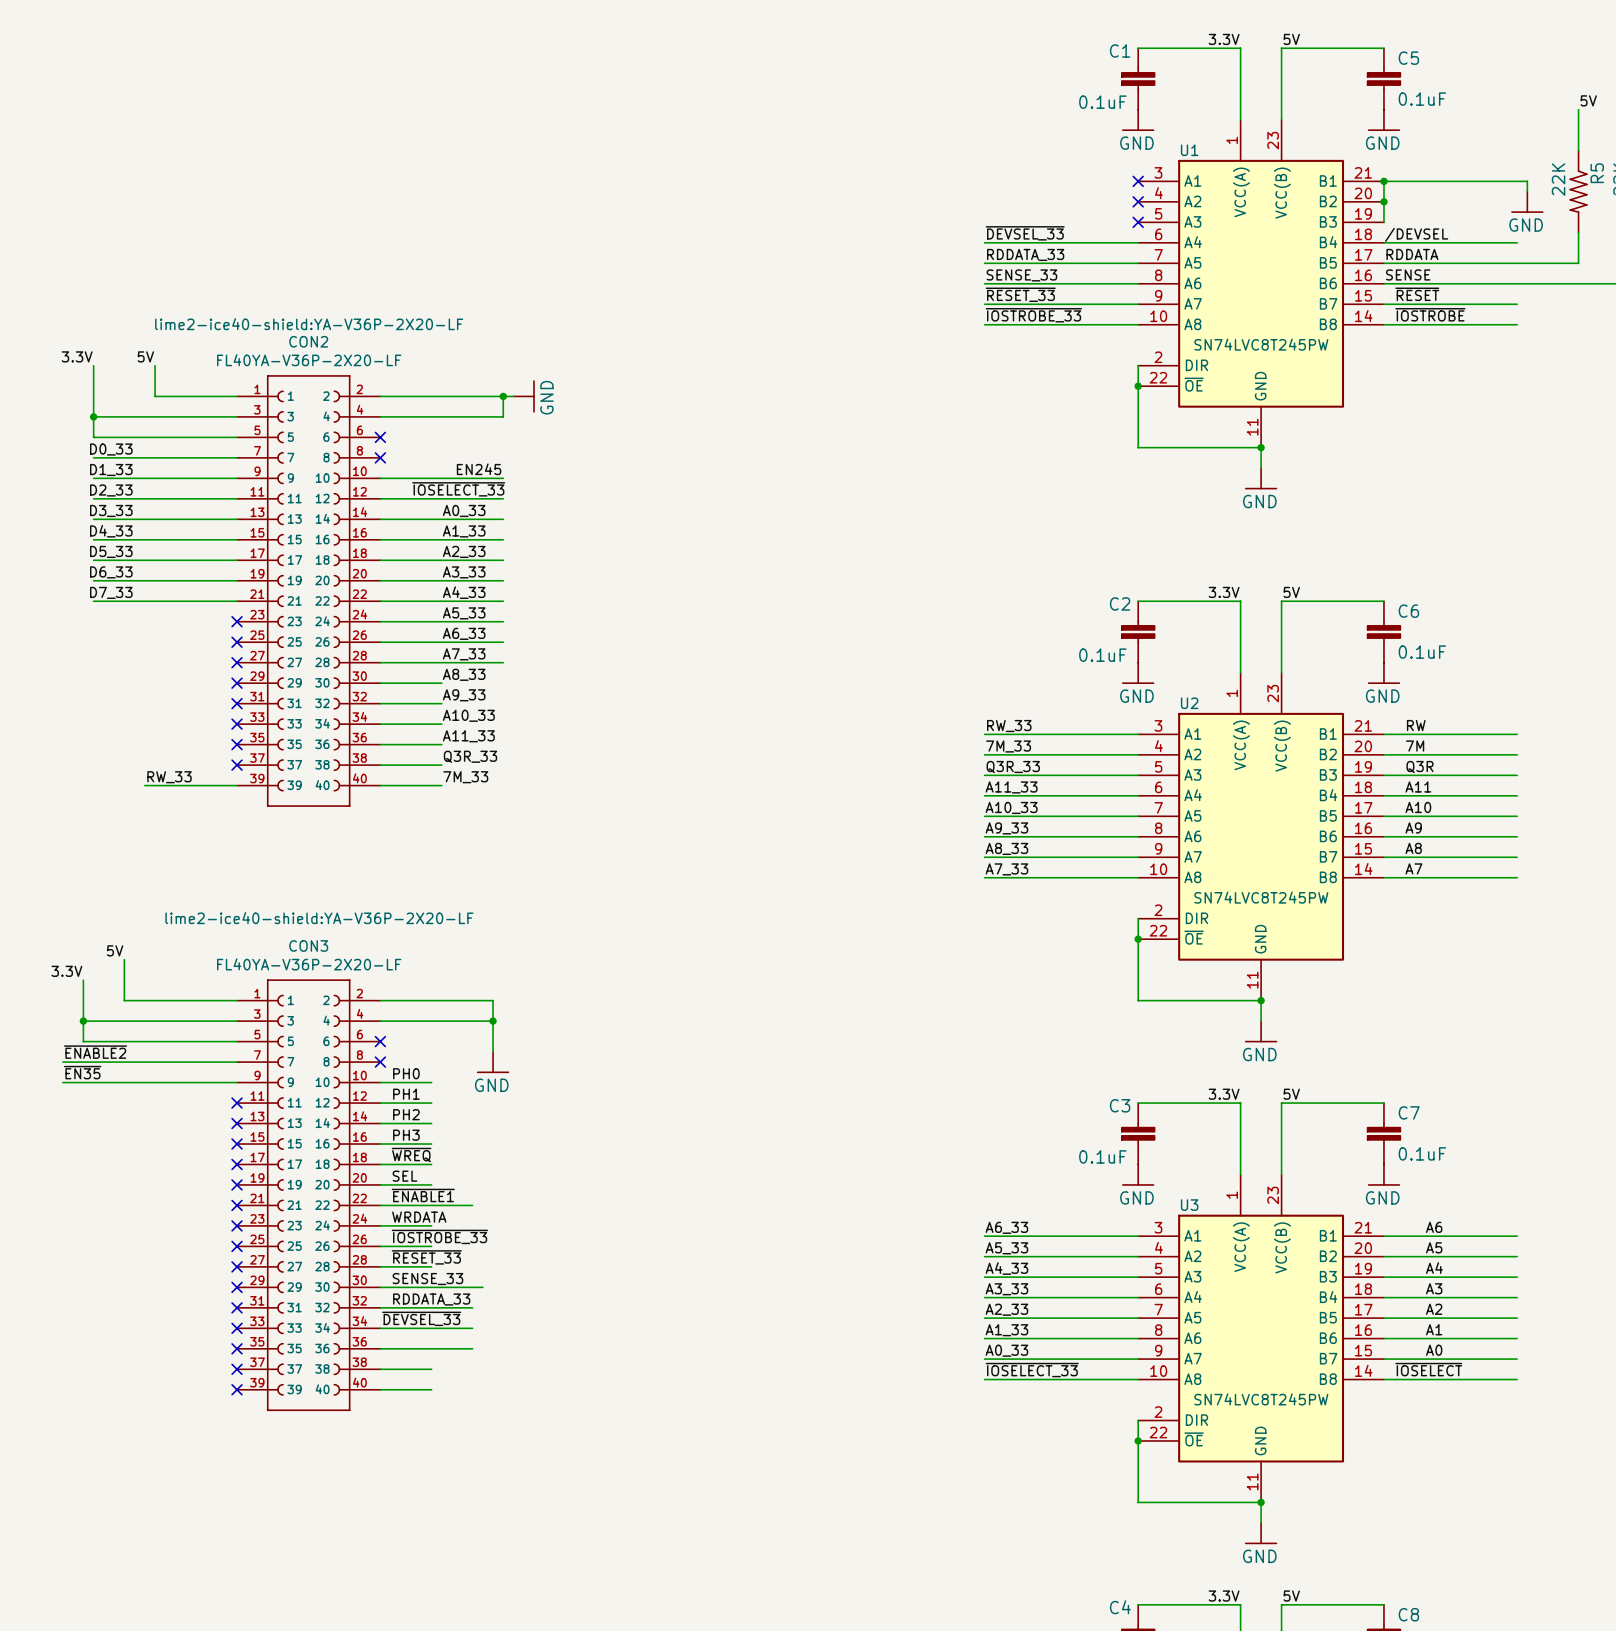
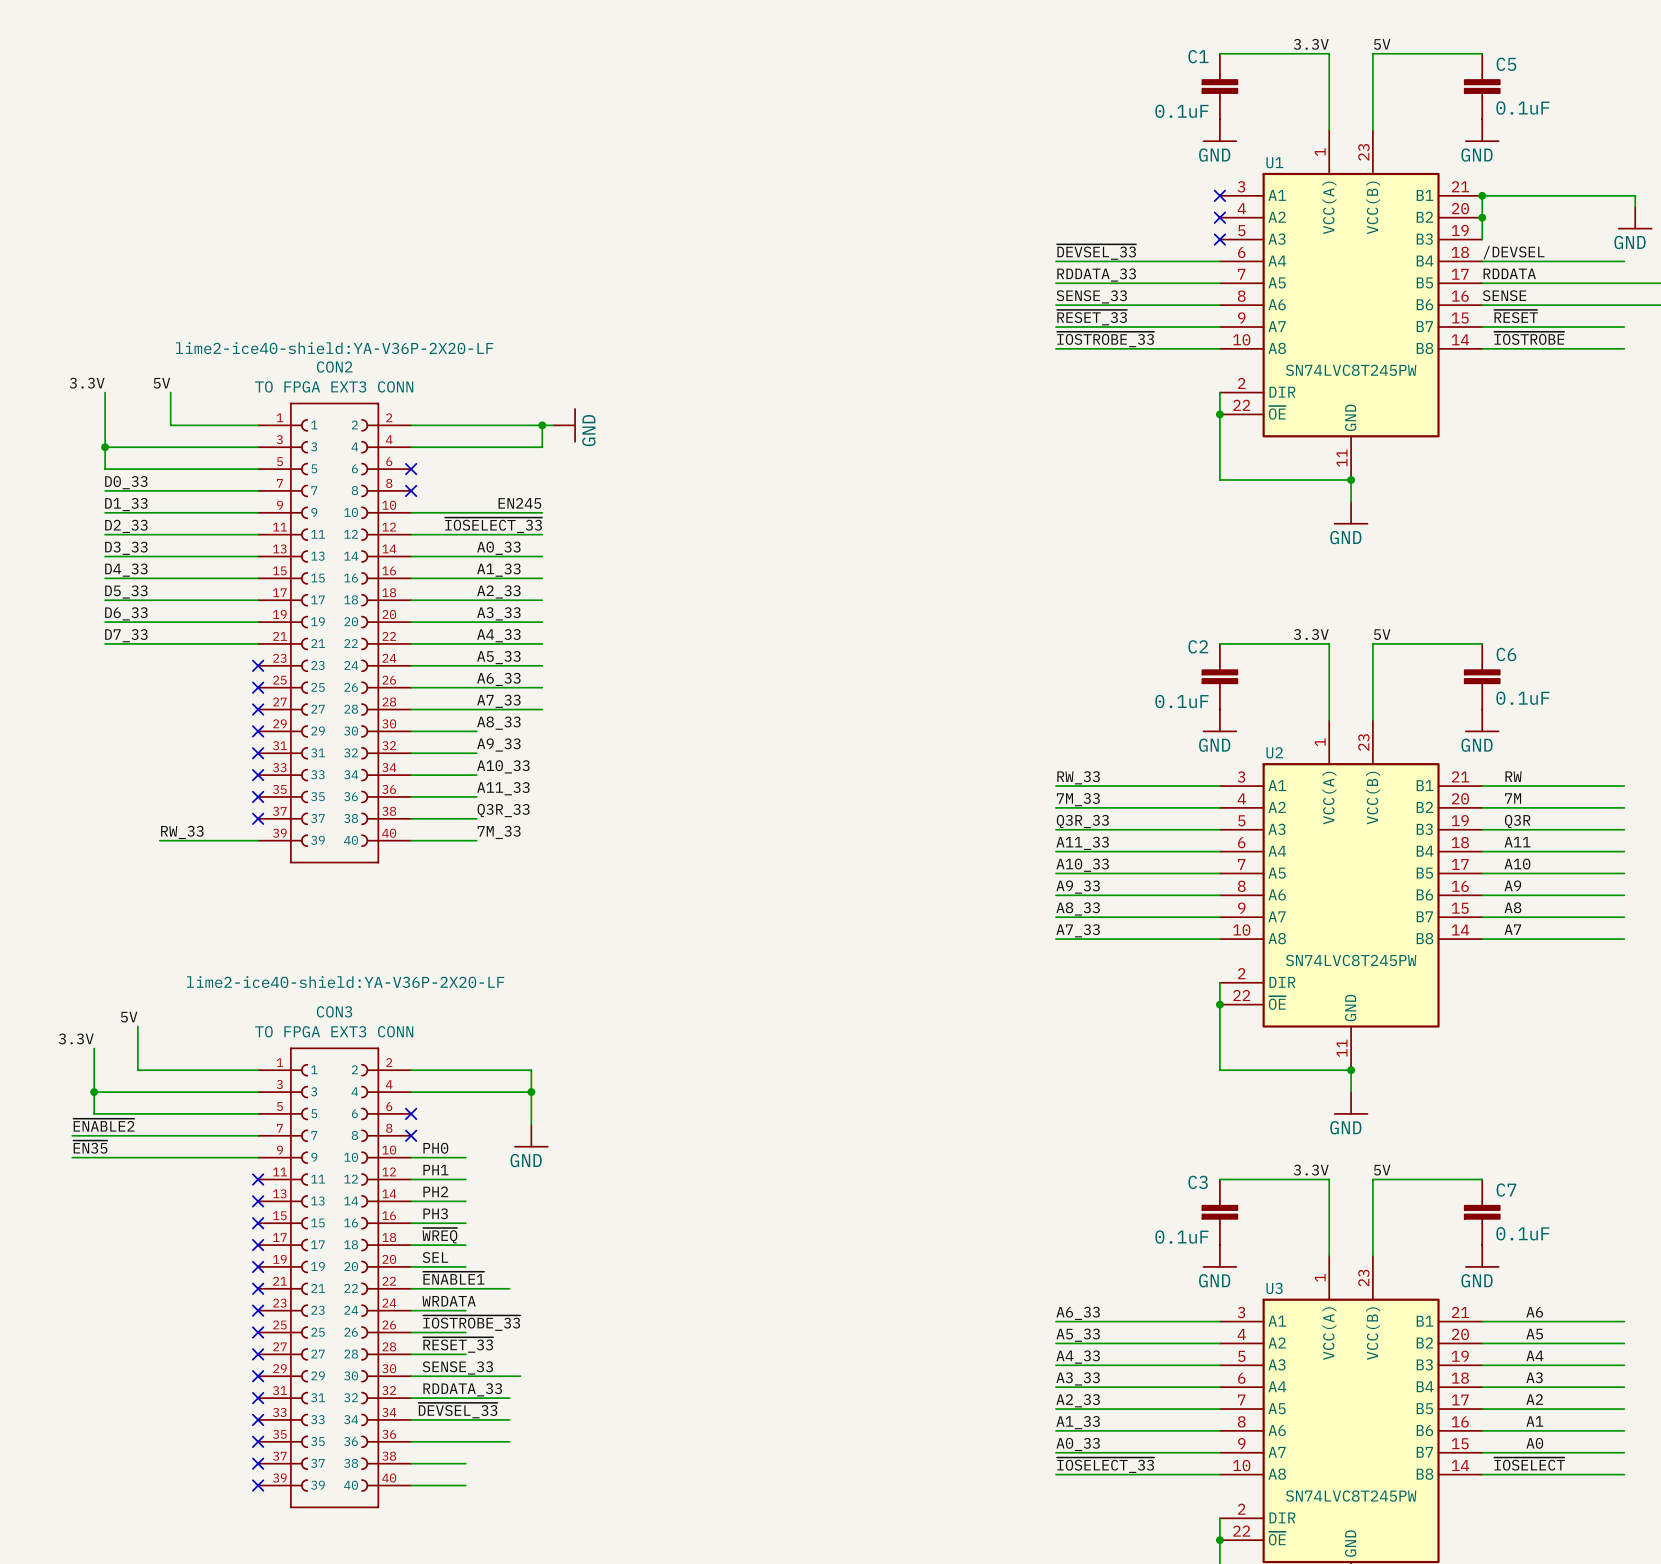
CON2 value: FL40YA-V36P-2X20-LF (309, 360) -> TO FPGA EXT3 CONN (334, 386)
CON3 value: FL40YA-V36P-2X20-LF (309, 964) -> TO FPGA EXT3 CONN (334, 1031)

